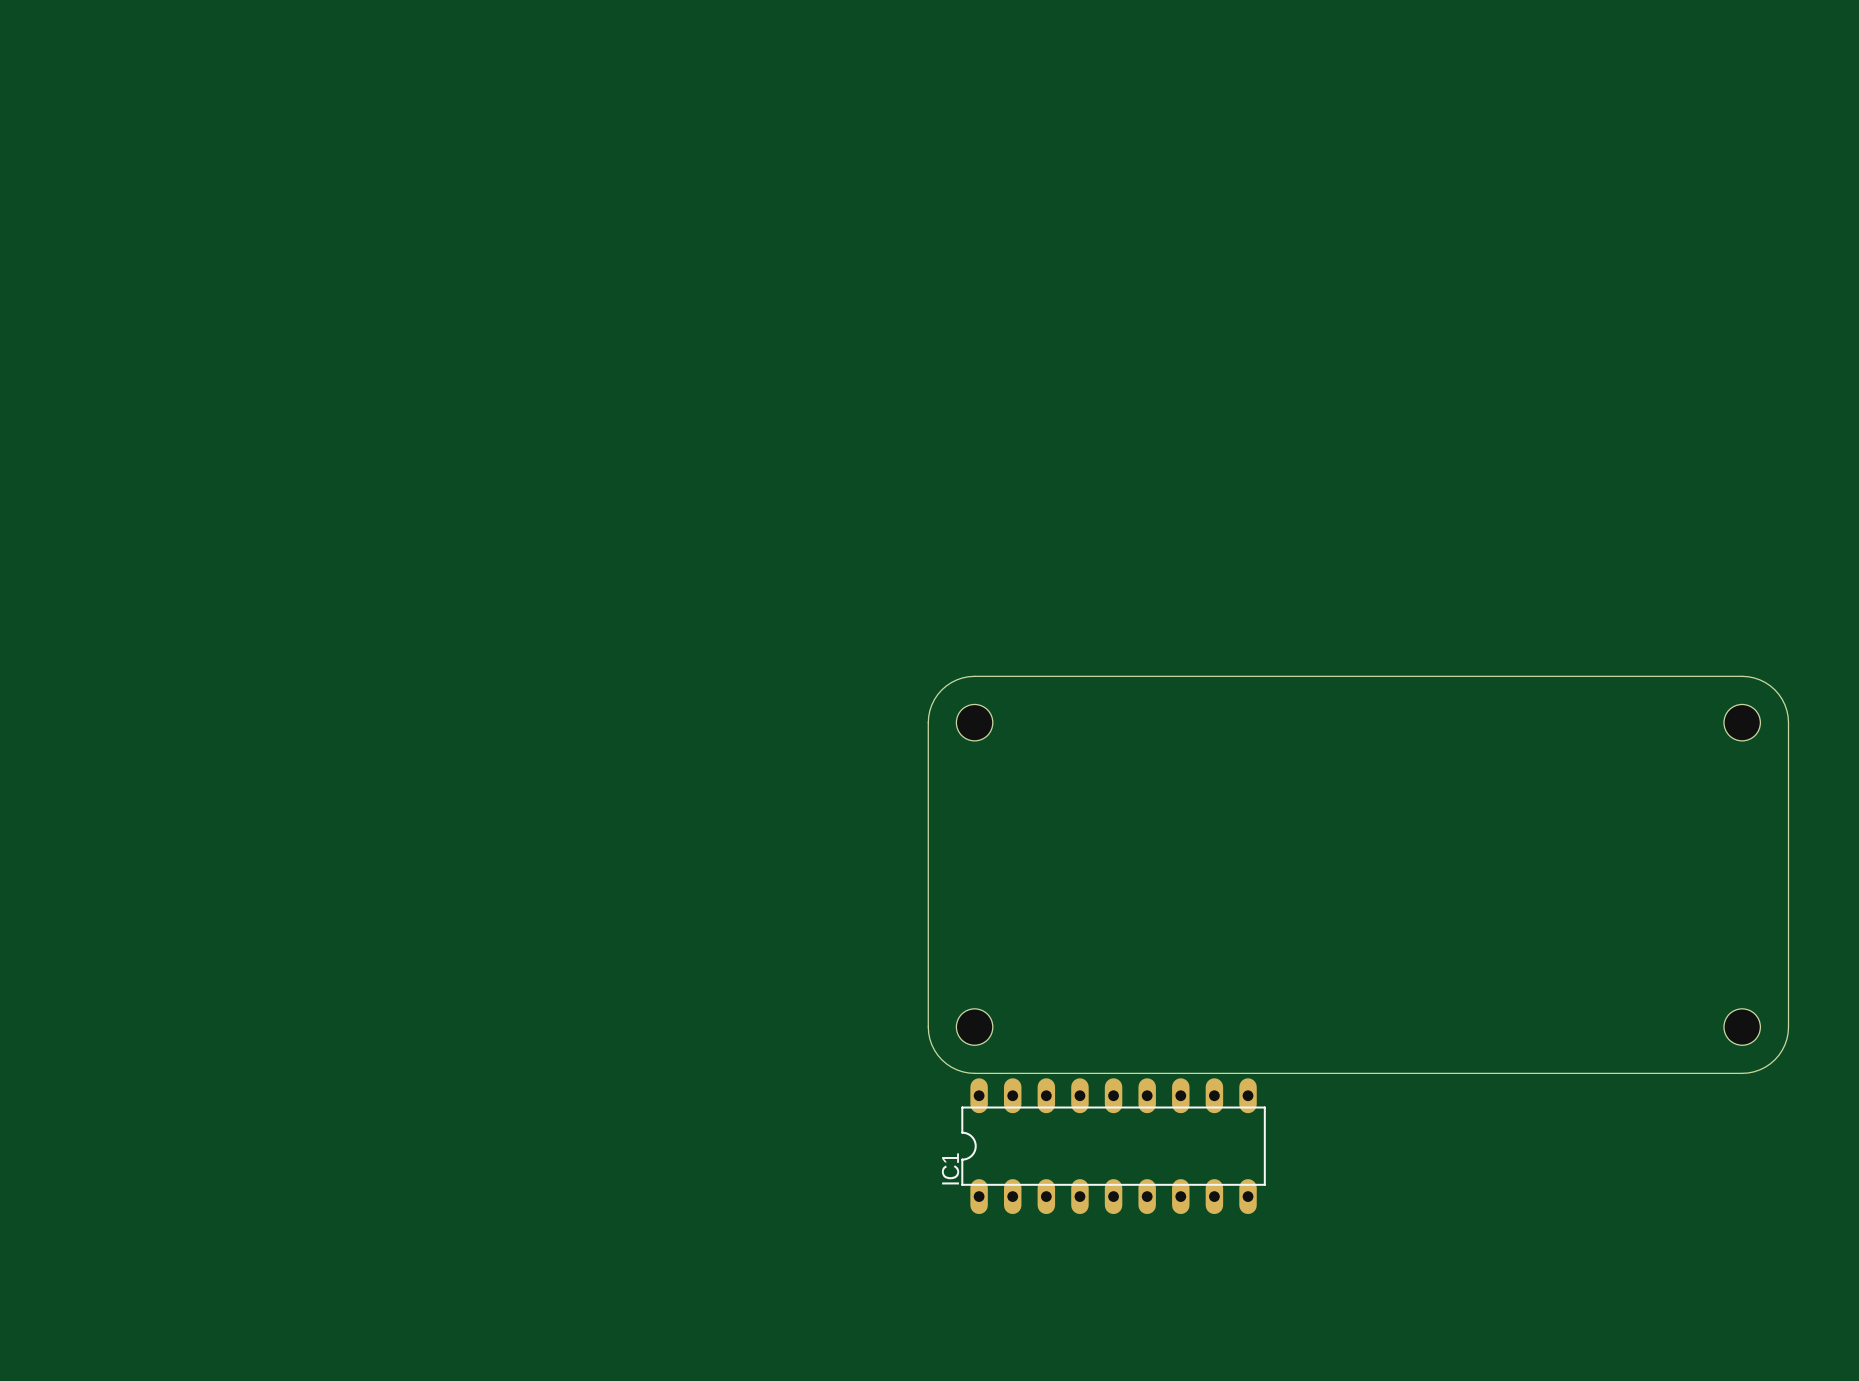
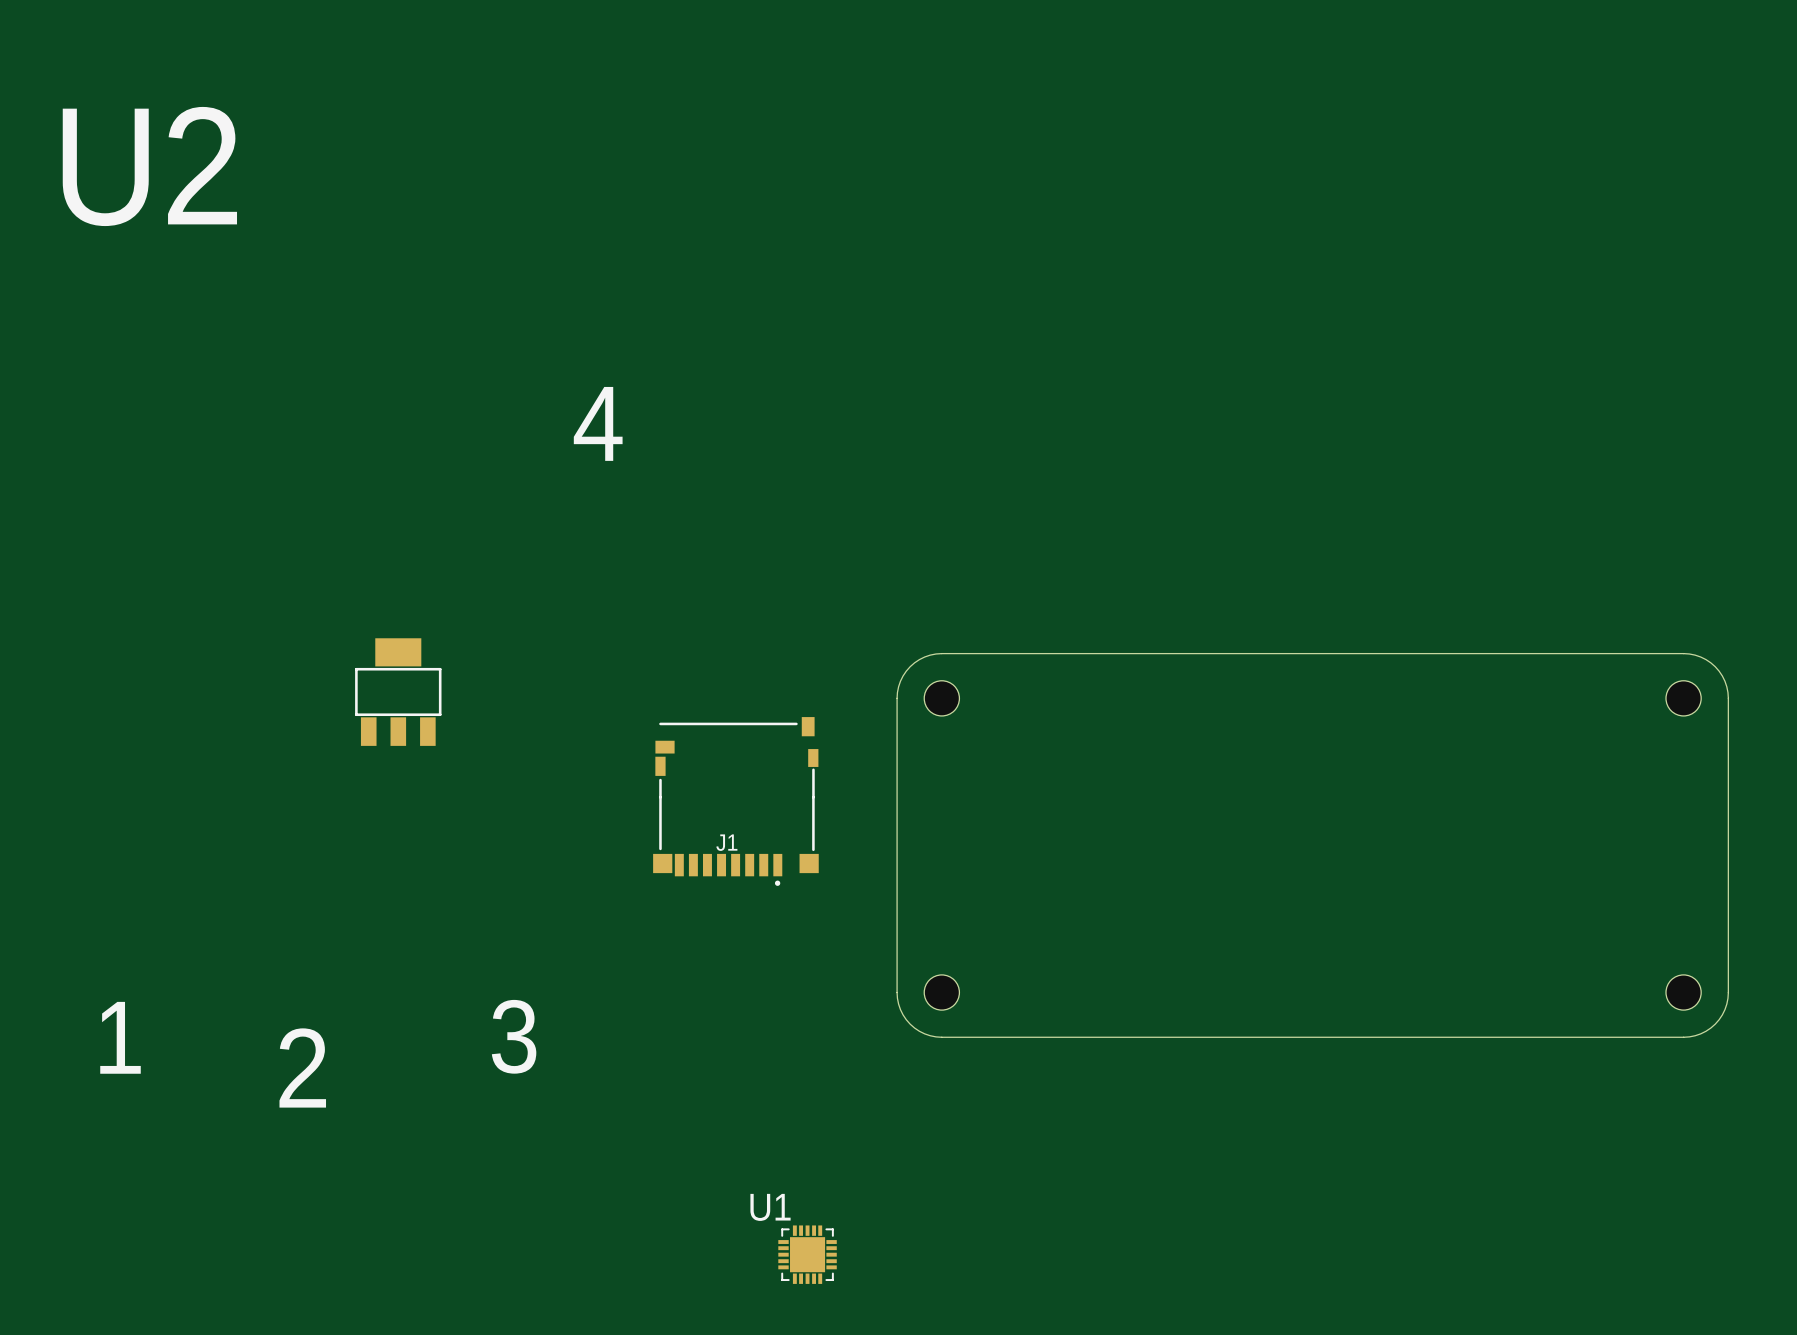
U2: none -> (398, 692)
J1: none -> (735, 801)
IC1: (1113, 1146) -> none
U1: none -> (807, 1254)

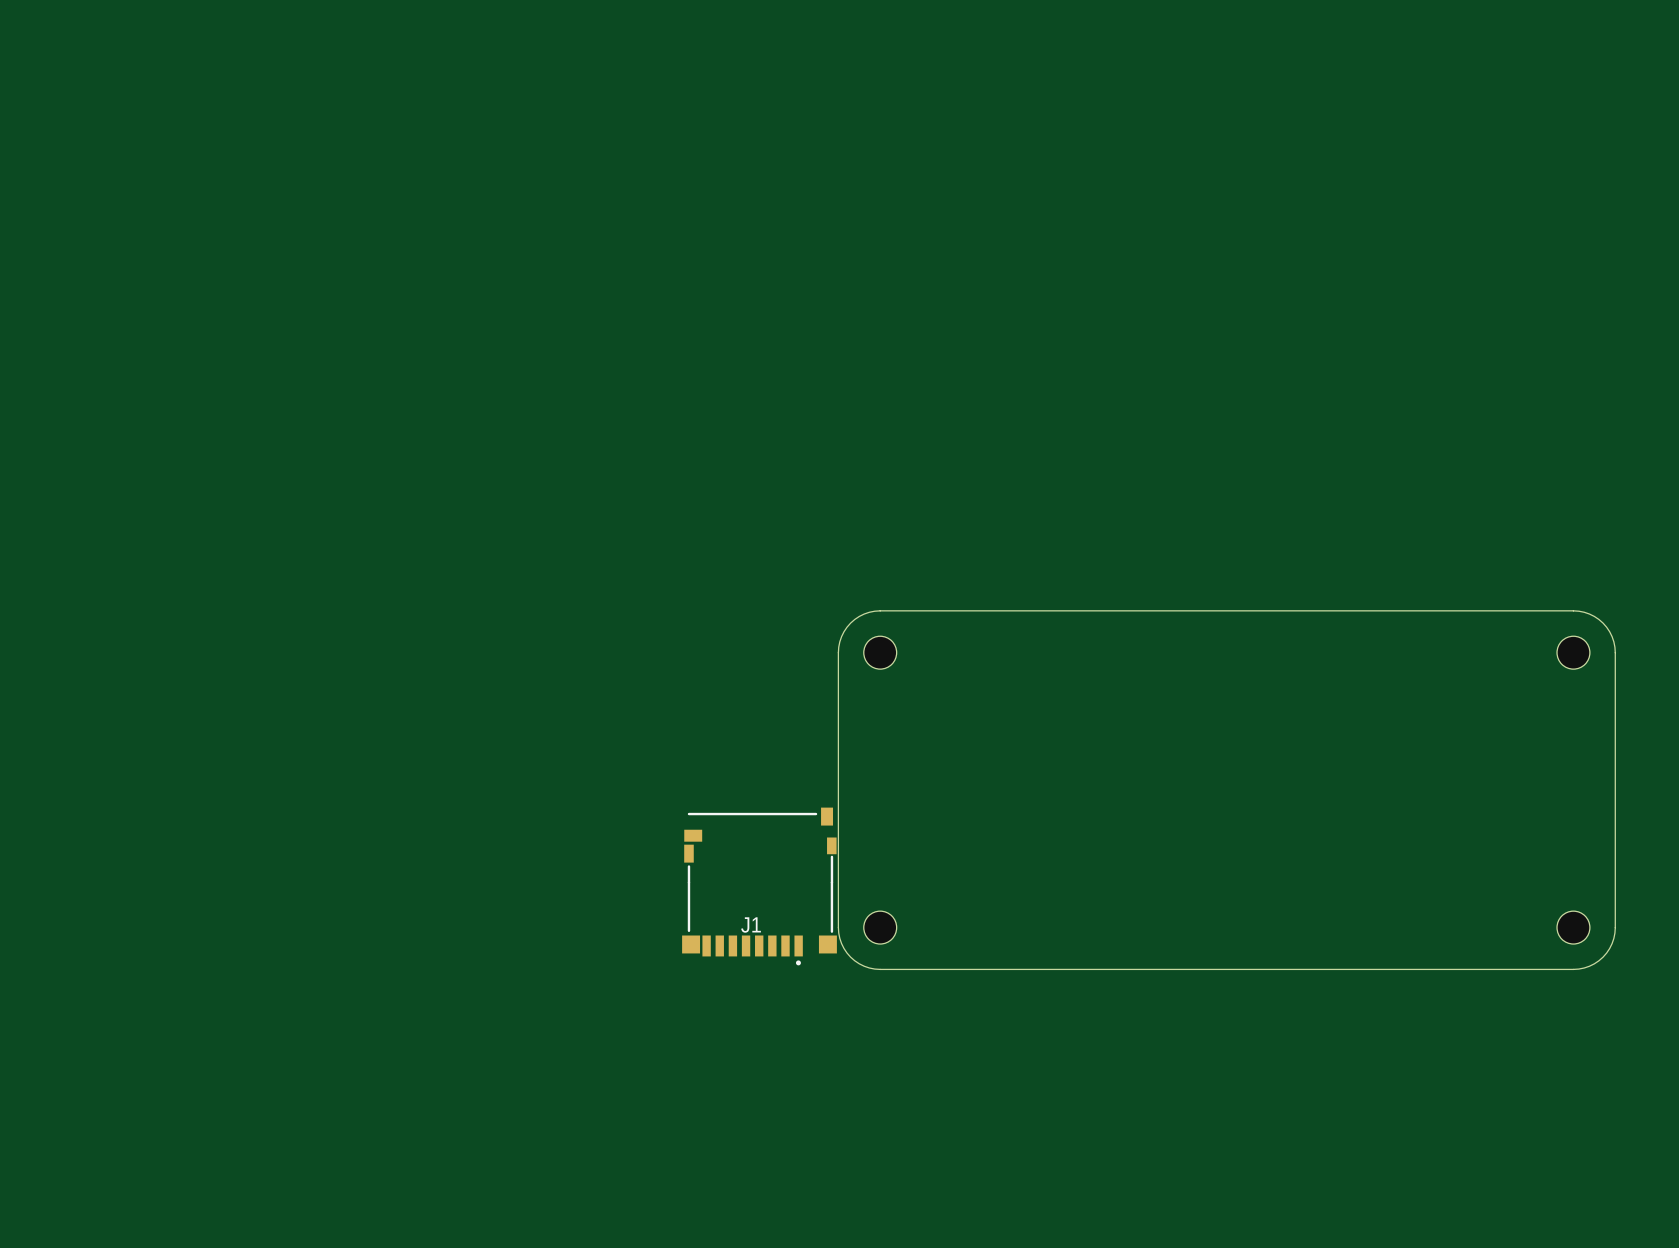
U2: (398, 692) -> none
J1 position: (735, 801) -> (759, 886)
U1: (807, 1254) -> none

